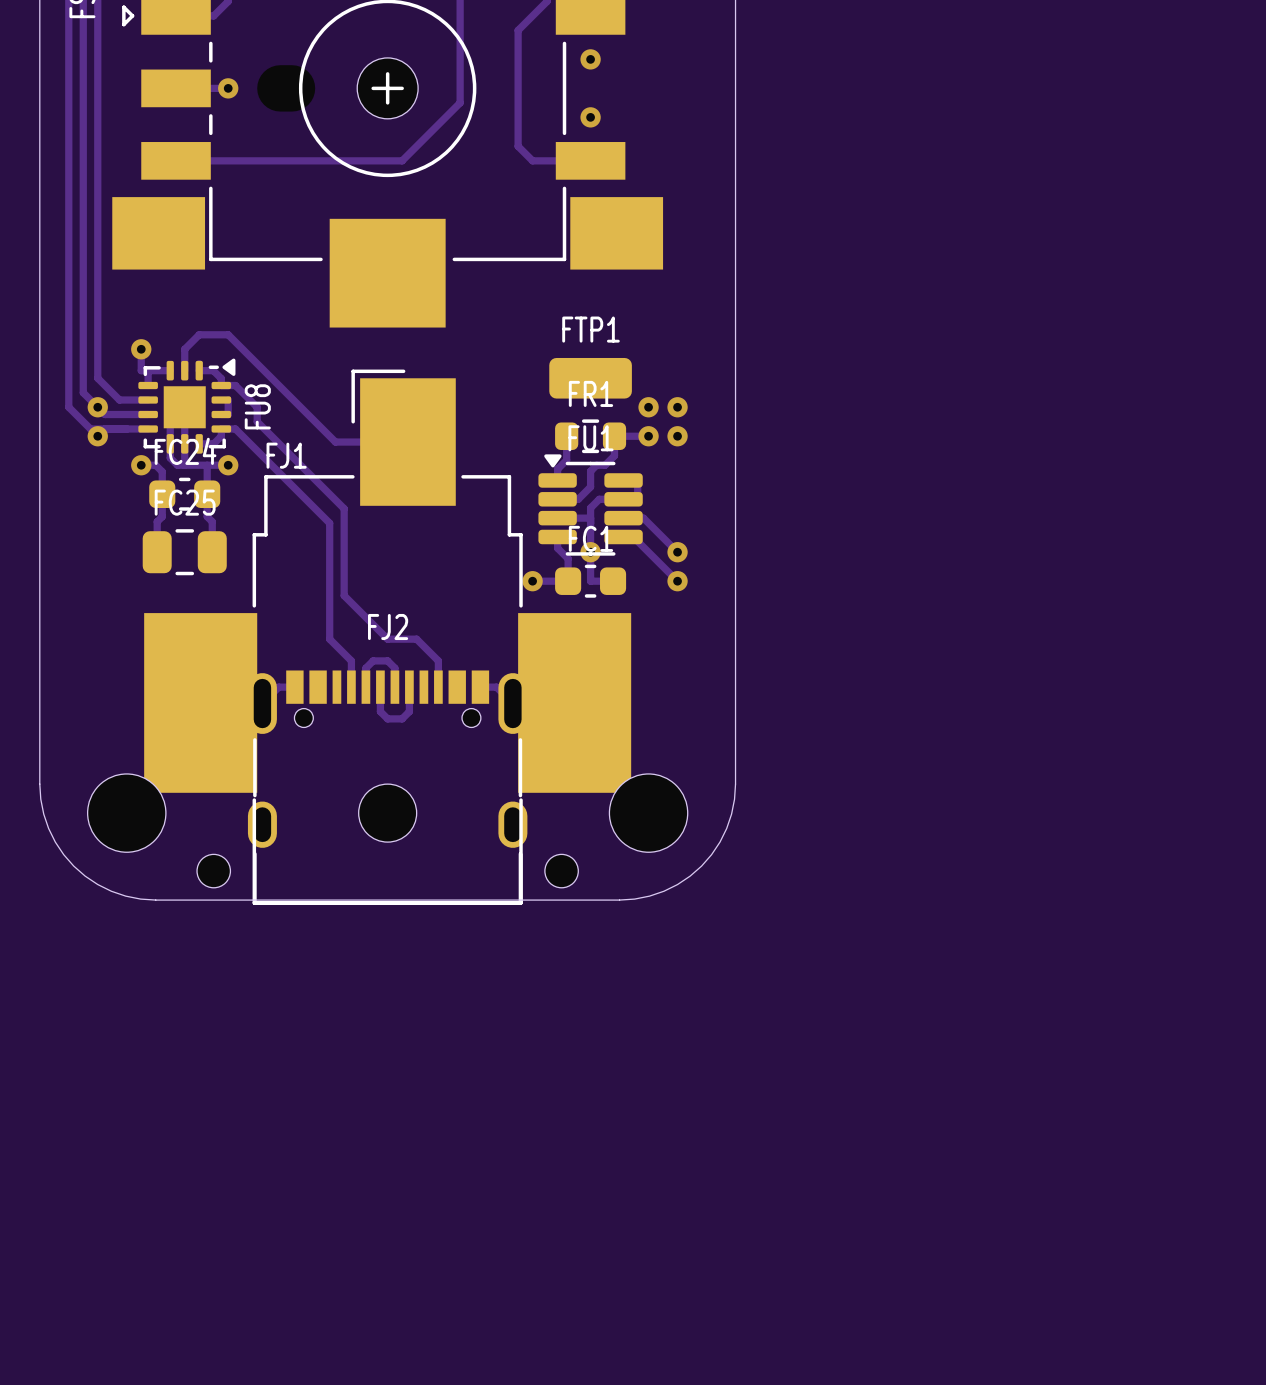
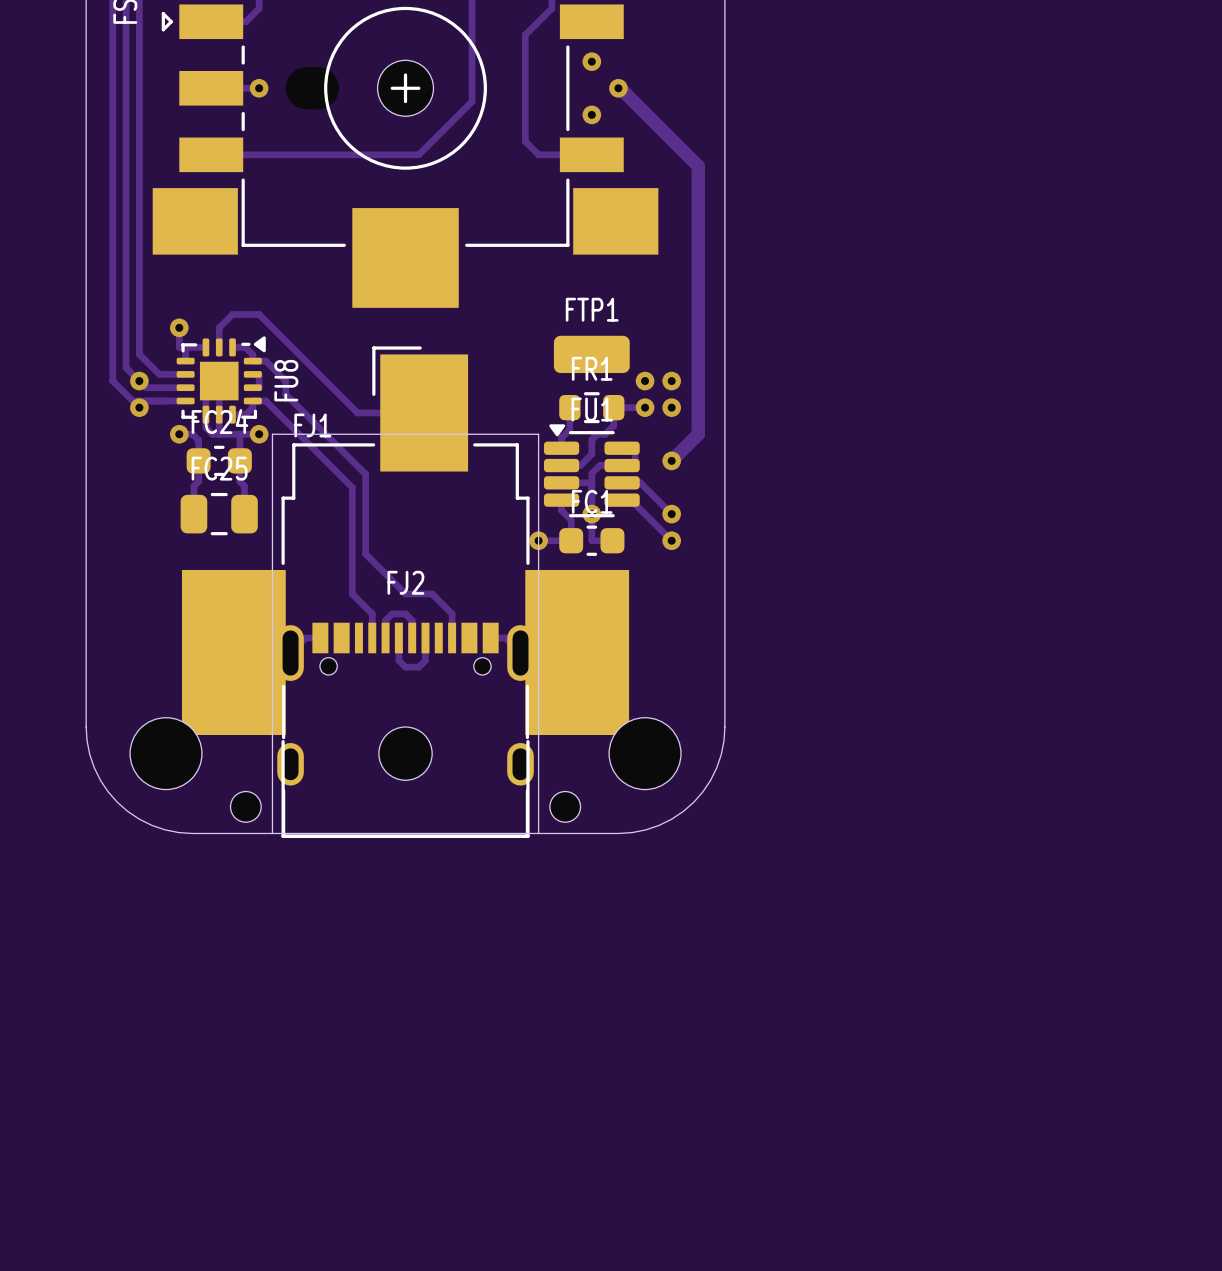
track: none -> (618, 88) (698, 166) (698, 434) (671, 460)
via: none -> (618, 88)
via: none -> (671, 460)
board edge: none -> (272, 833) (272, 434) (538, 434) (538, 833)

